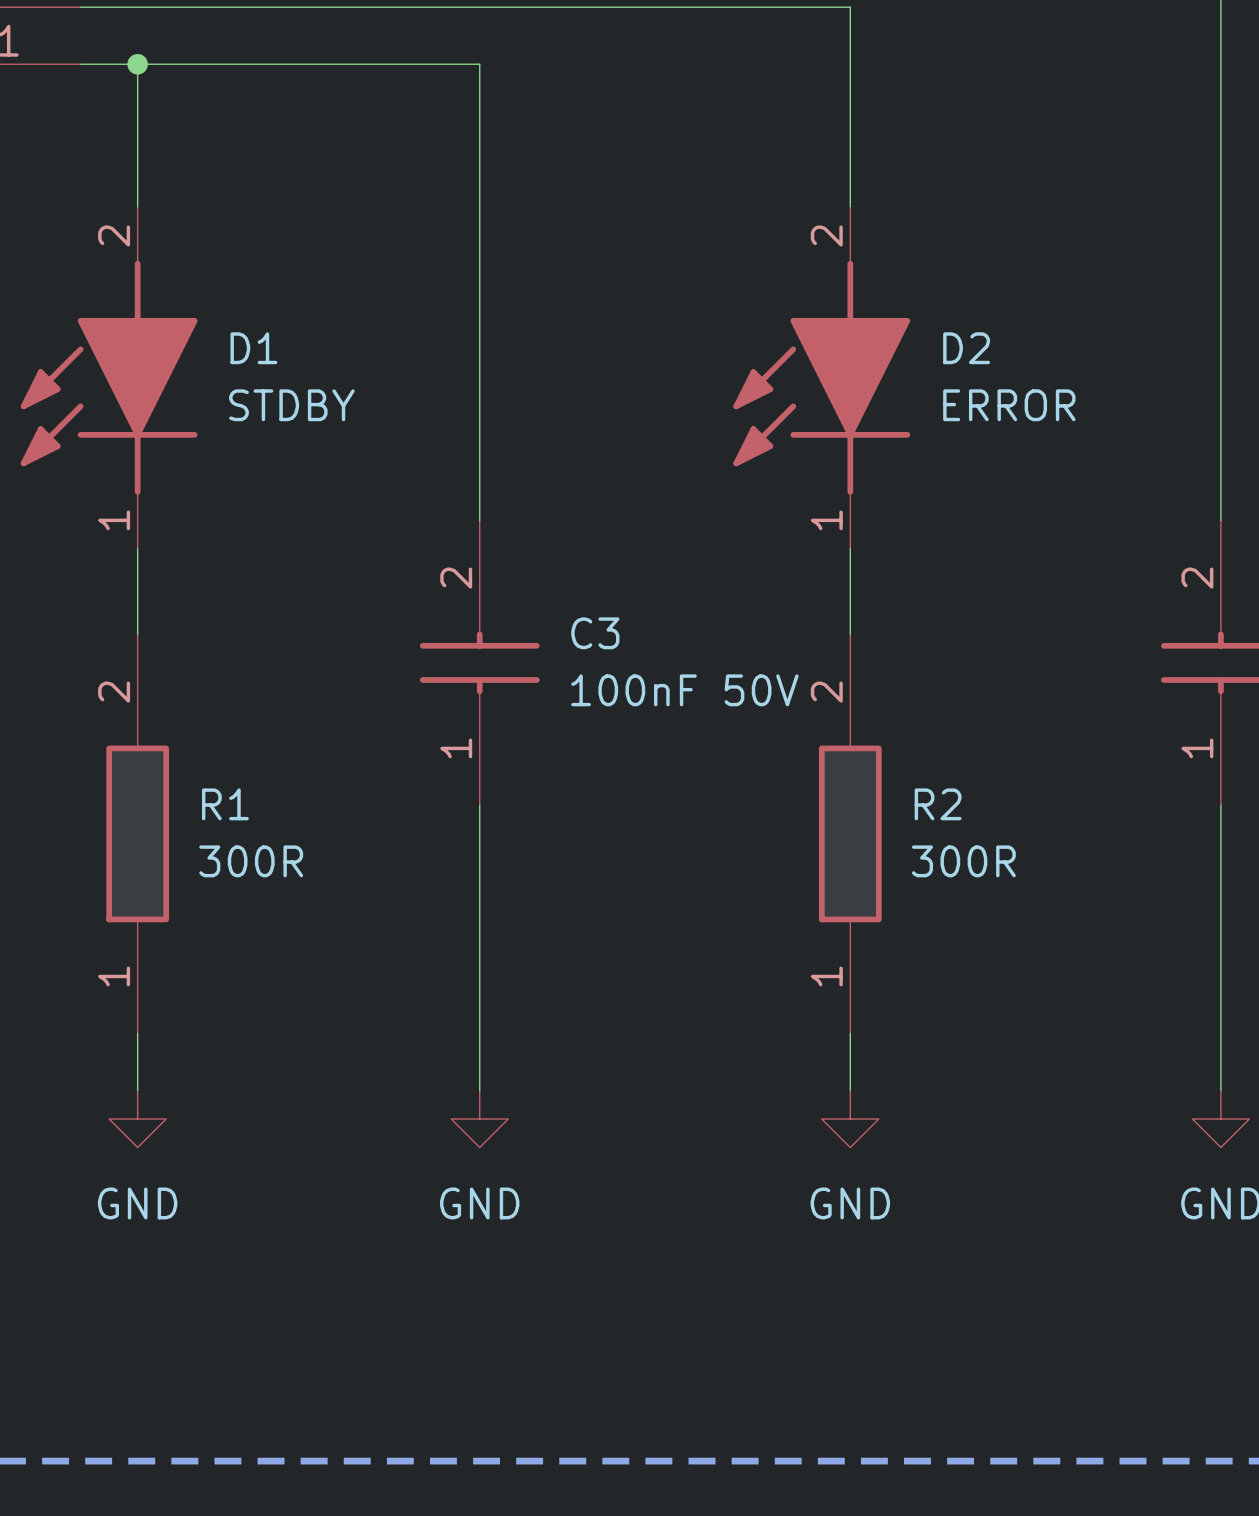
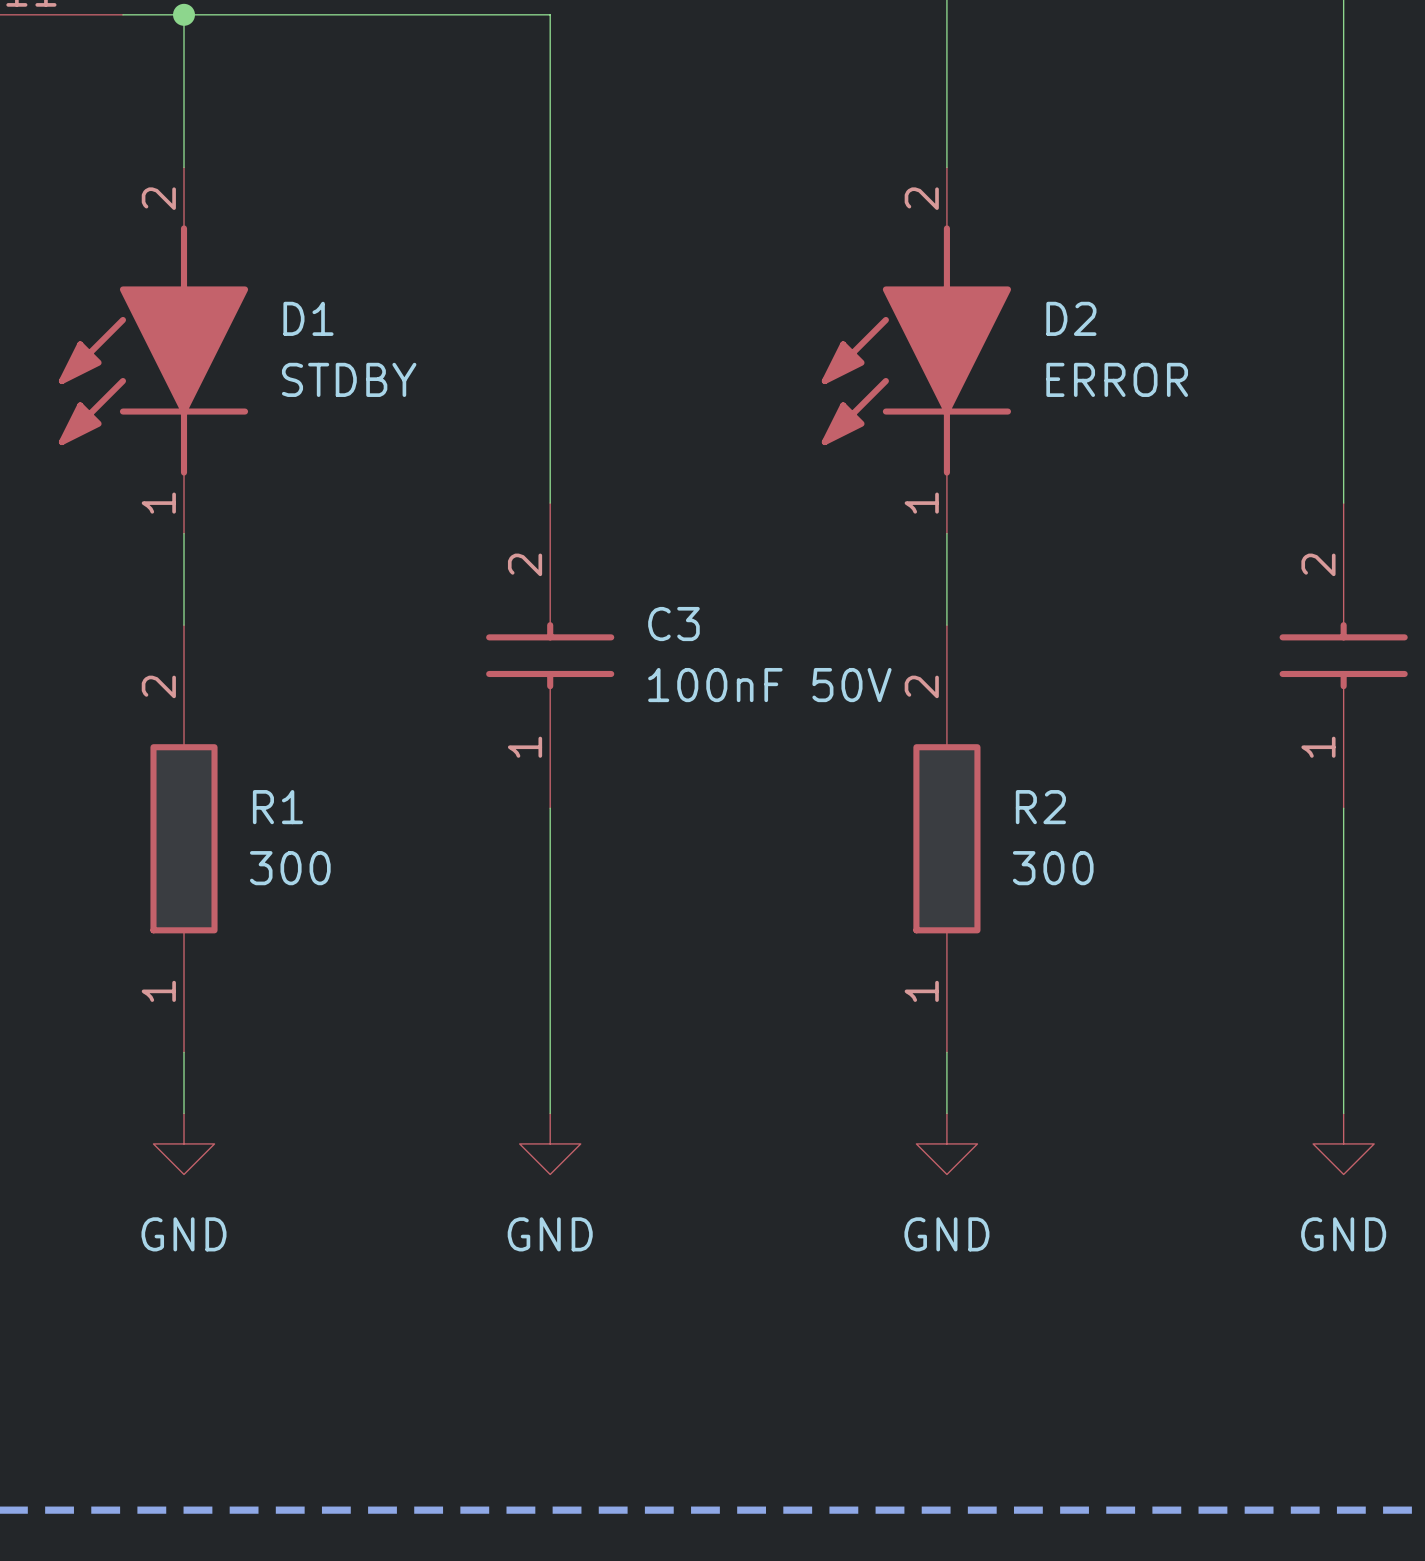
R1 value: 300R (251, 861) -> 300 (290, 868)
R2 value: 300R (963, 861) -> 300 (1053, 868)

